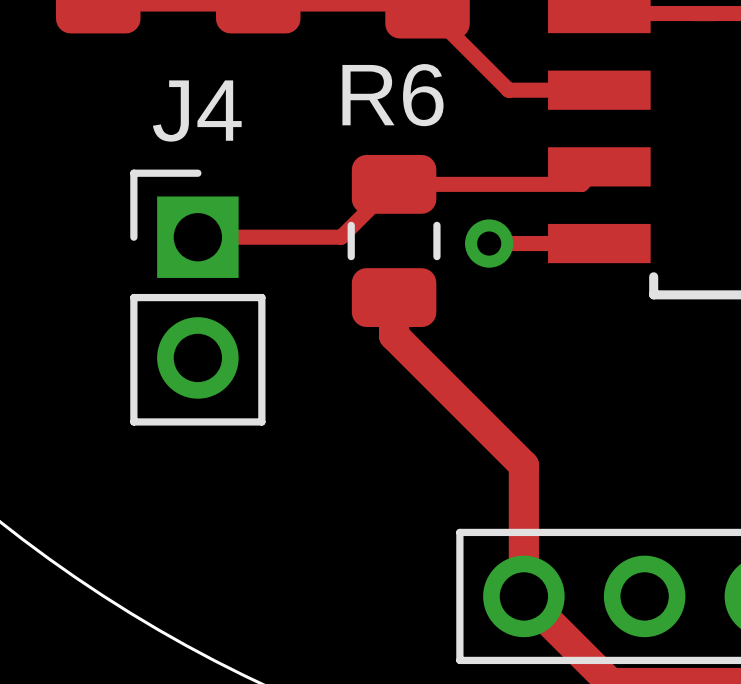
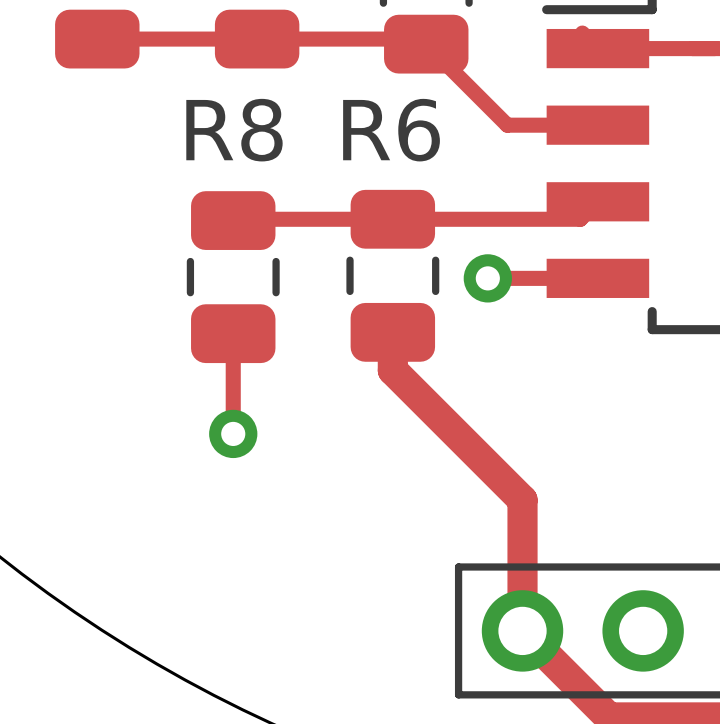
track: (394, 184) (341, 237) (197, 237) -> (392, 219) (233, 220)
R8: none -> (233, 277)
J4: (197, 297) -> none
track: none -> (233, 333) (233, 433)
via: none -> (233, 433)

